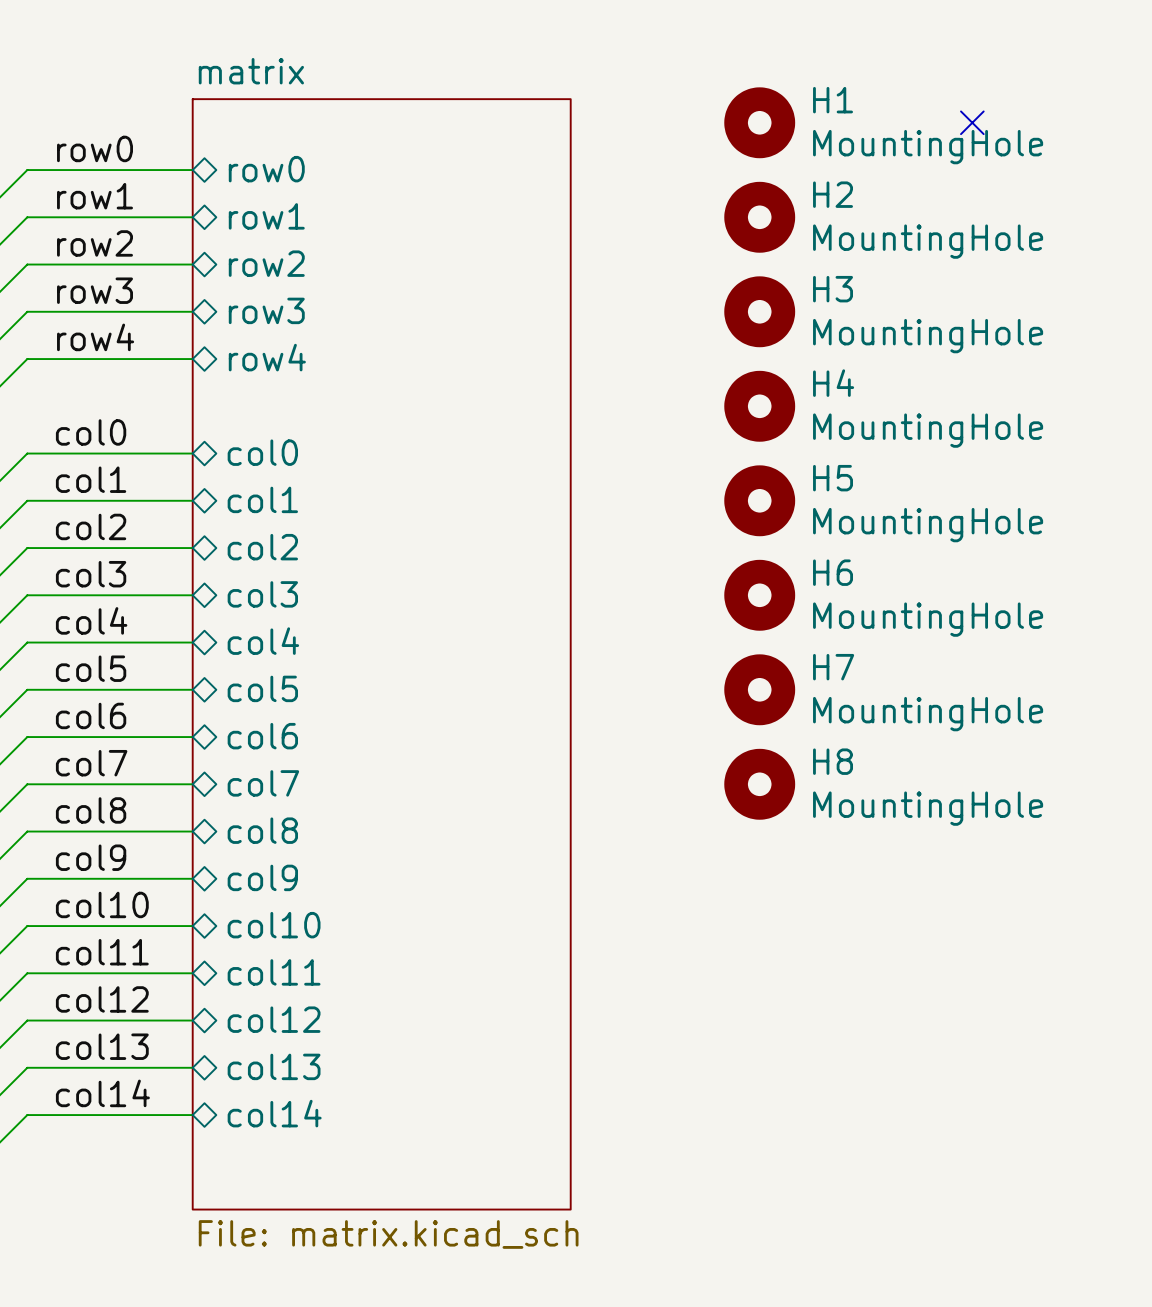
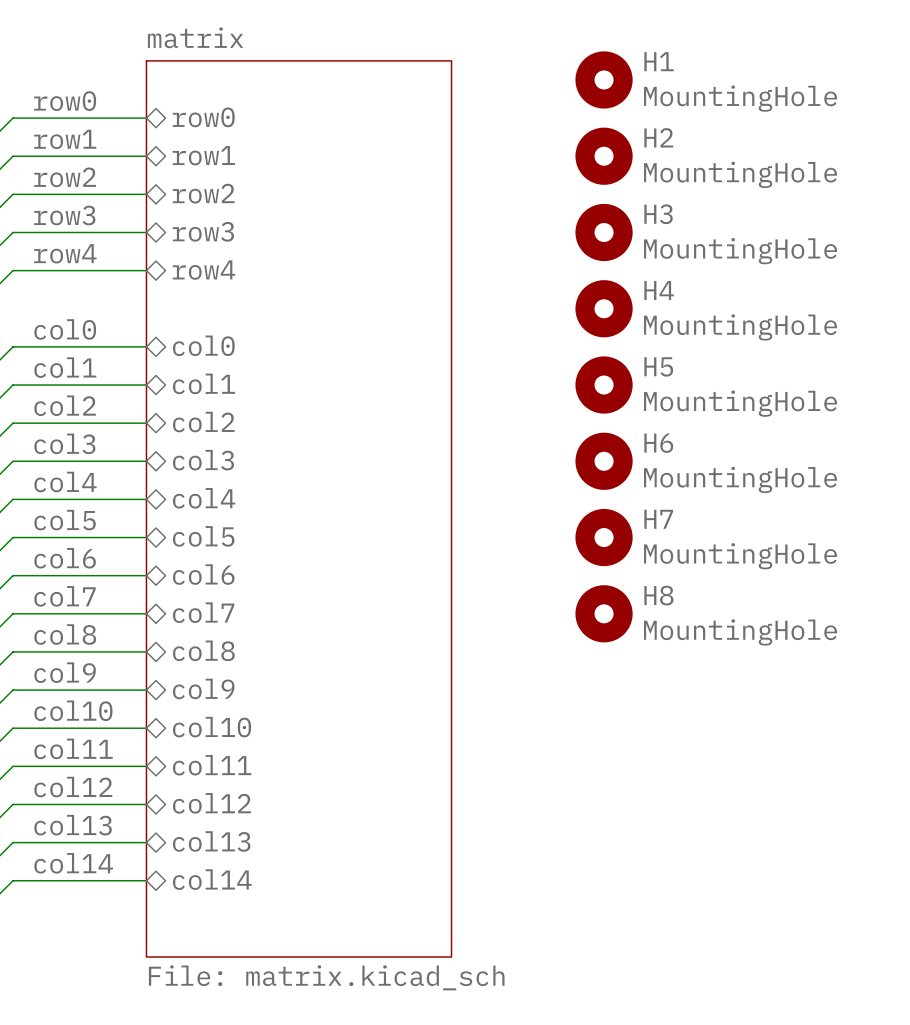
no-connect mark: (972, 122) -> none

